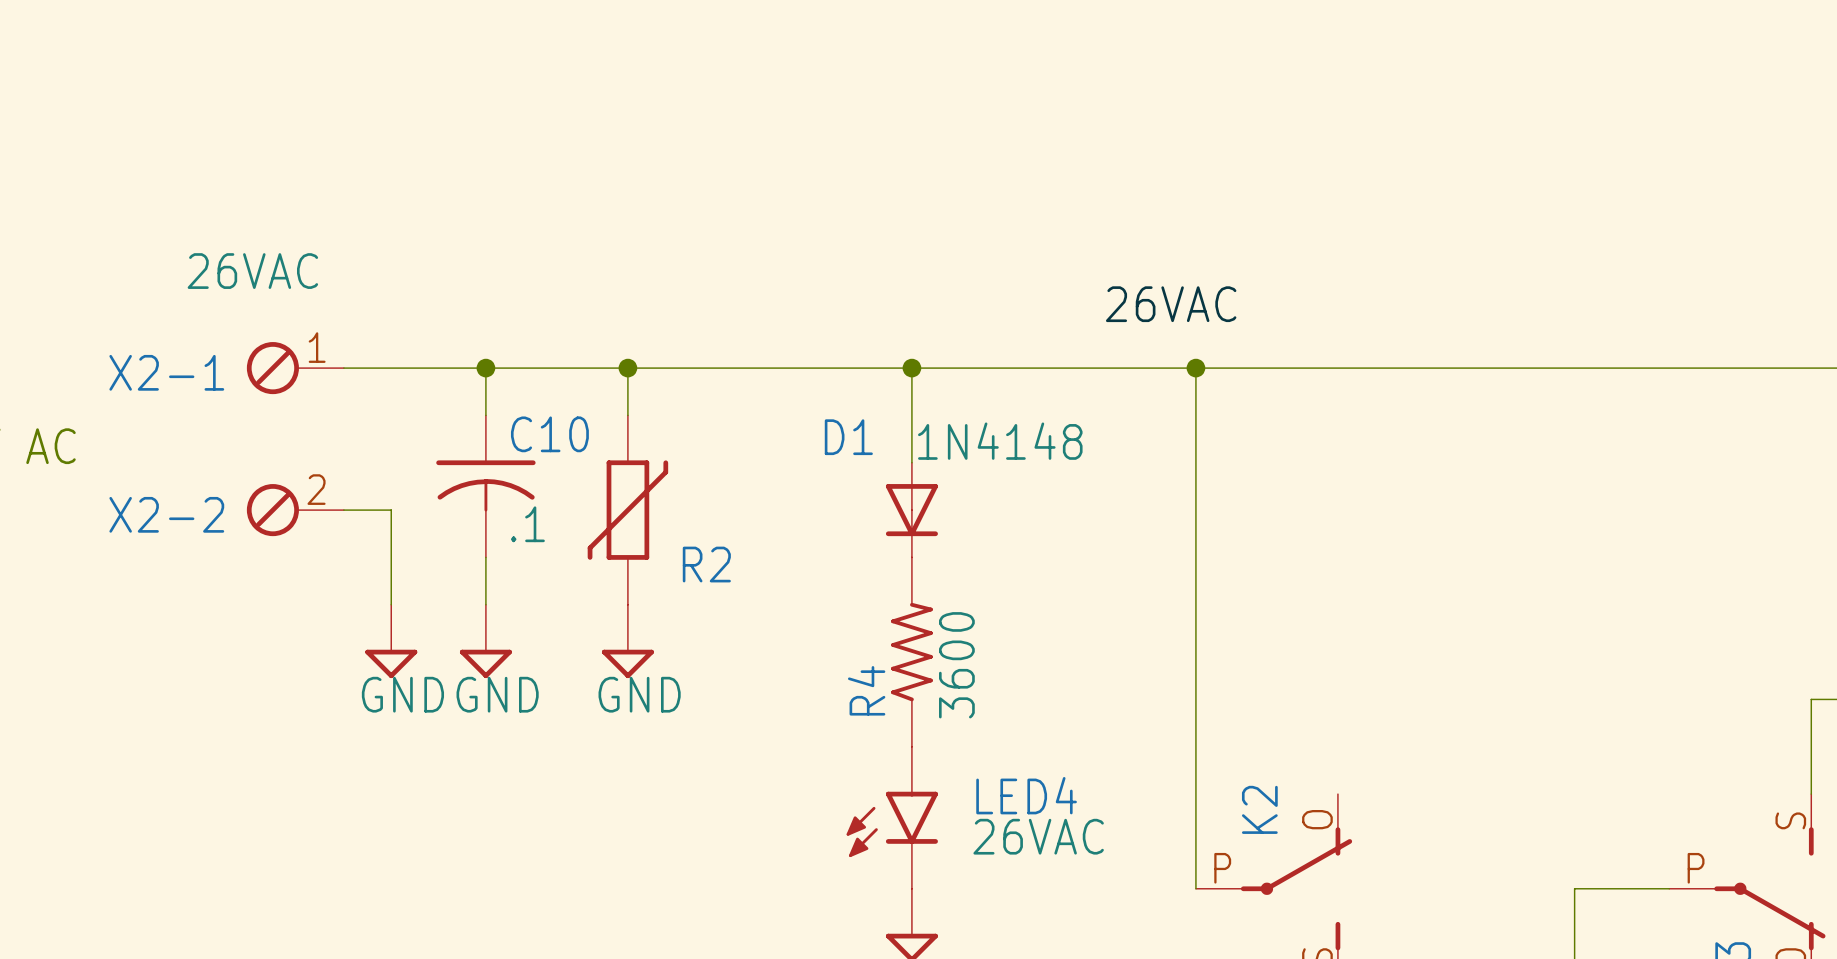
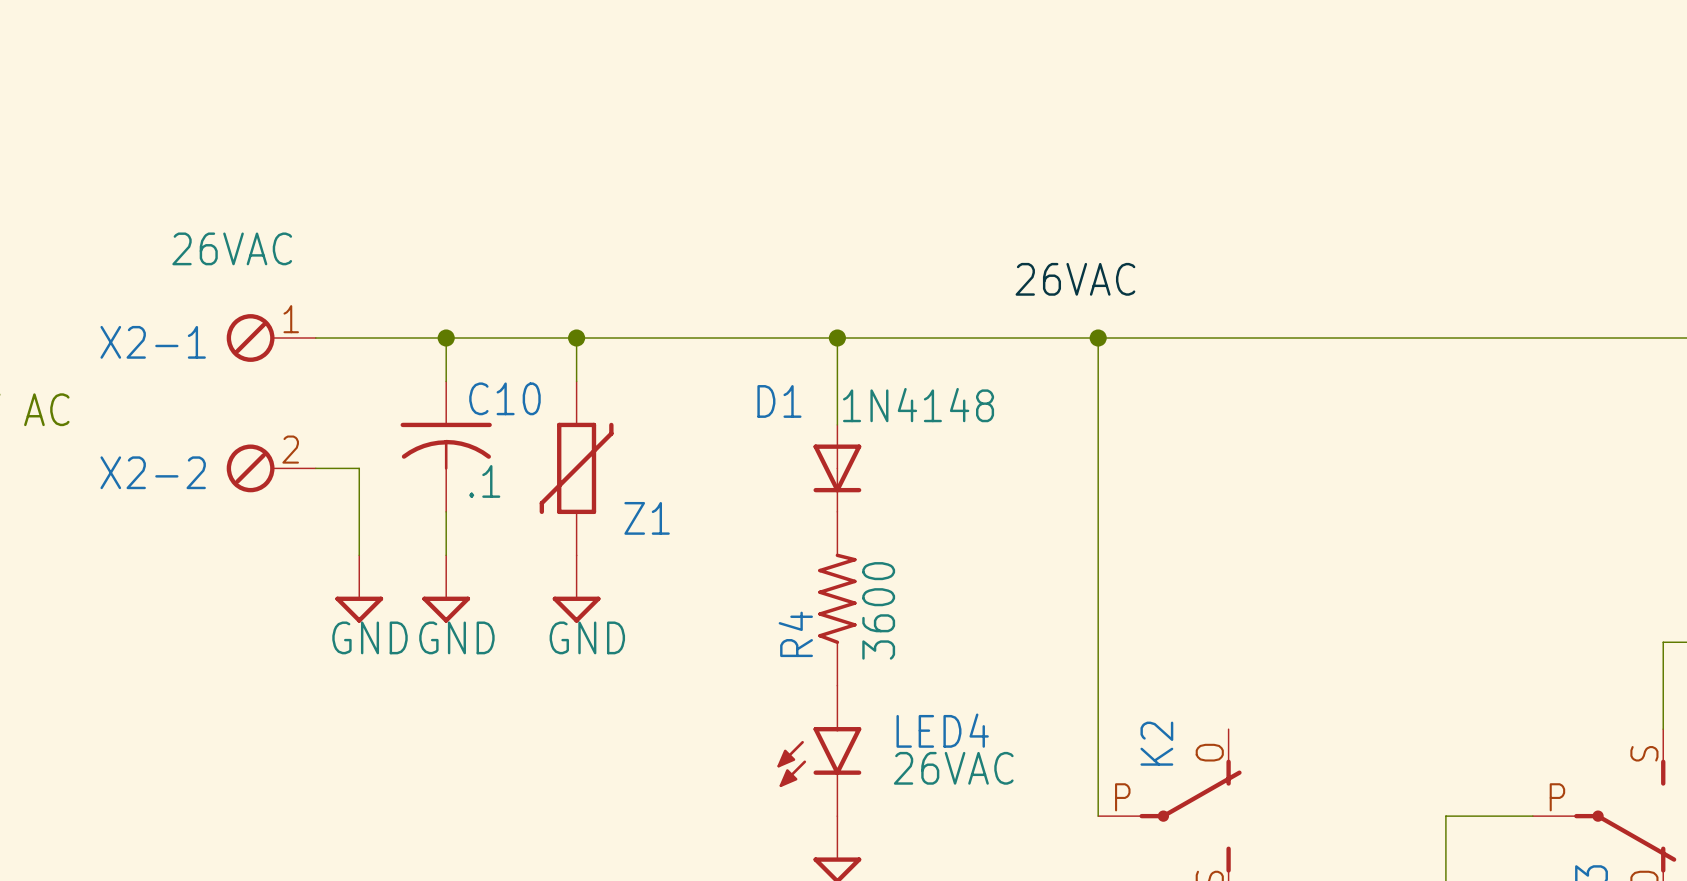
R2 name: R2 (706, 564) -> Z1 (647, 518)

